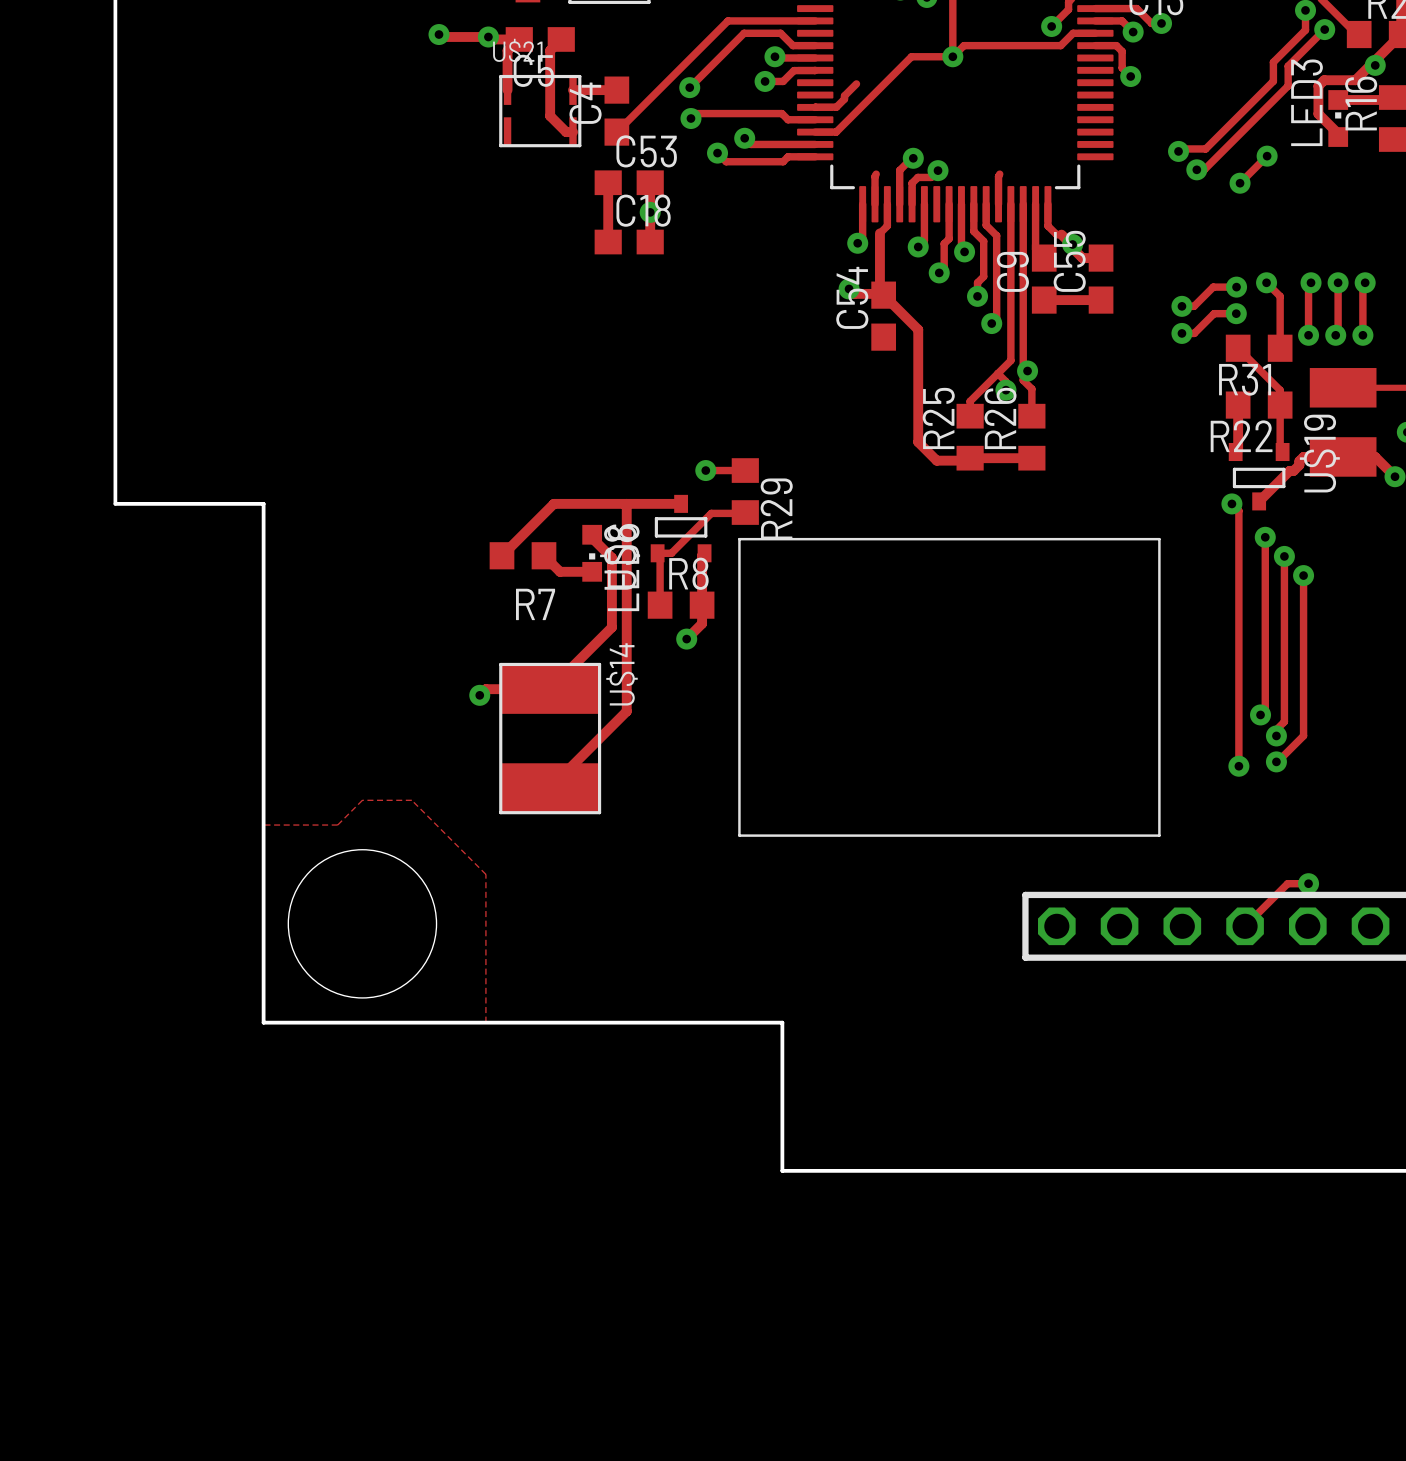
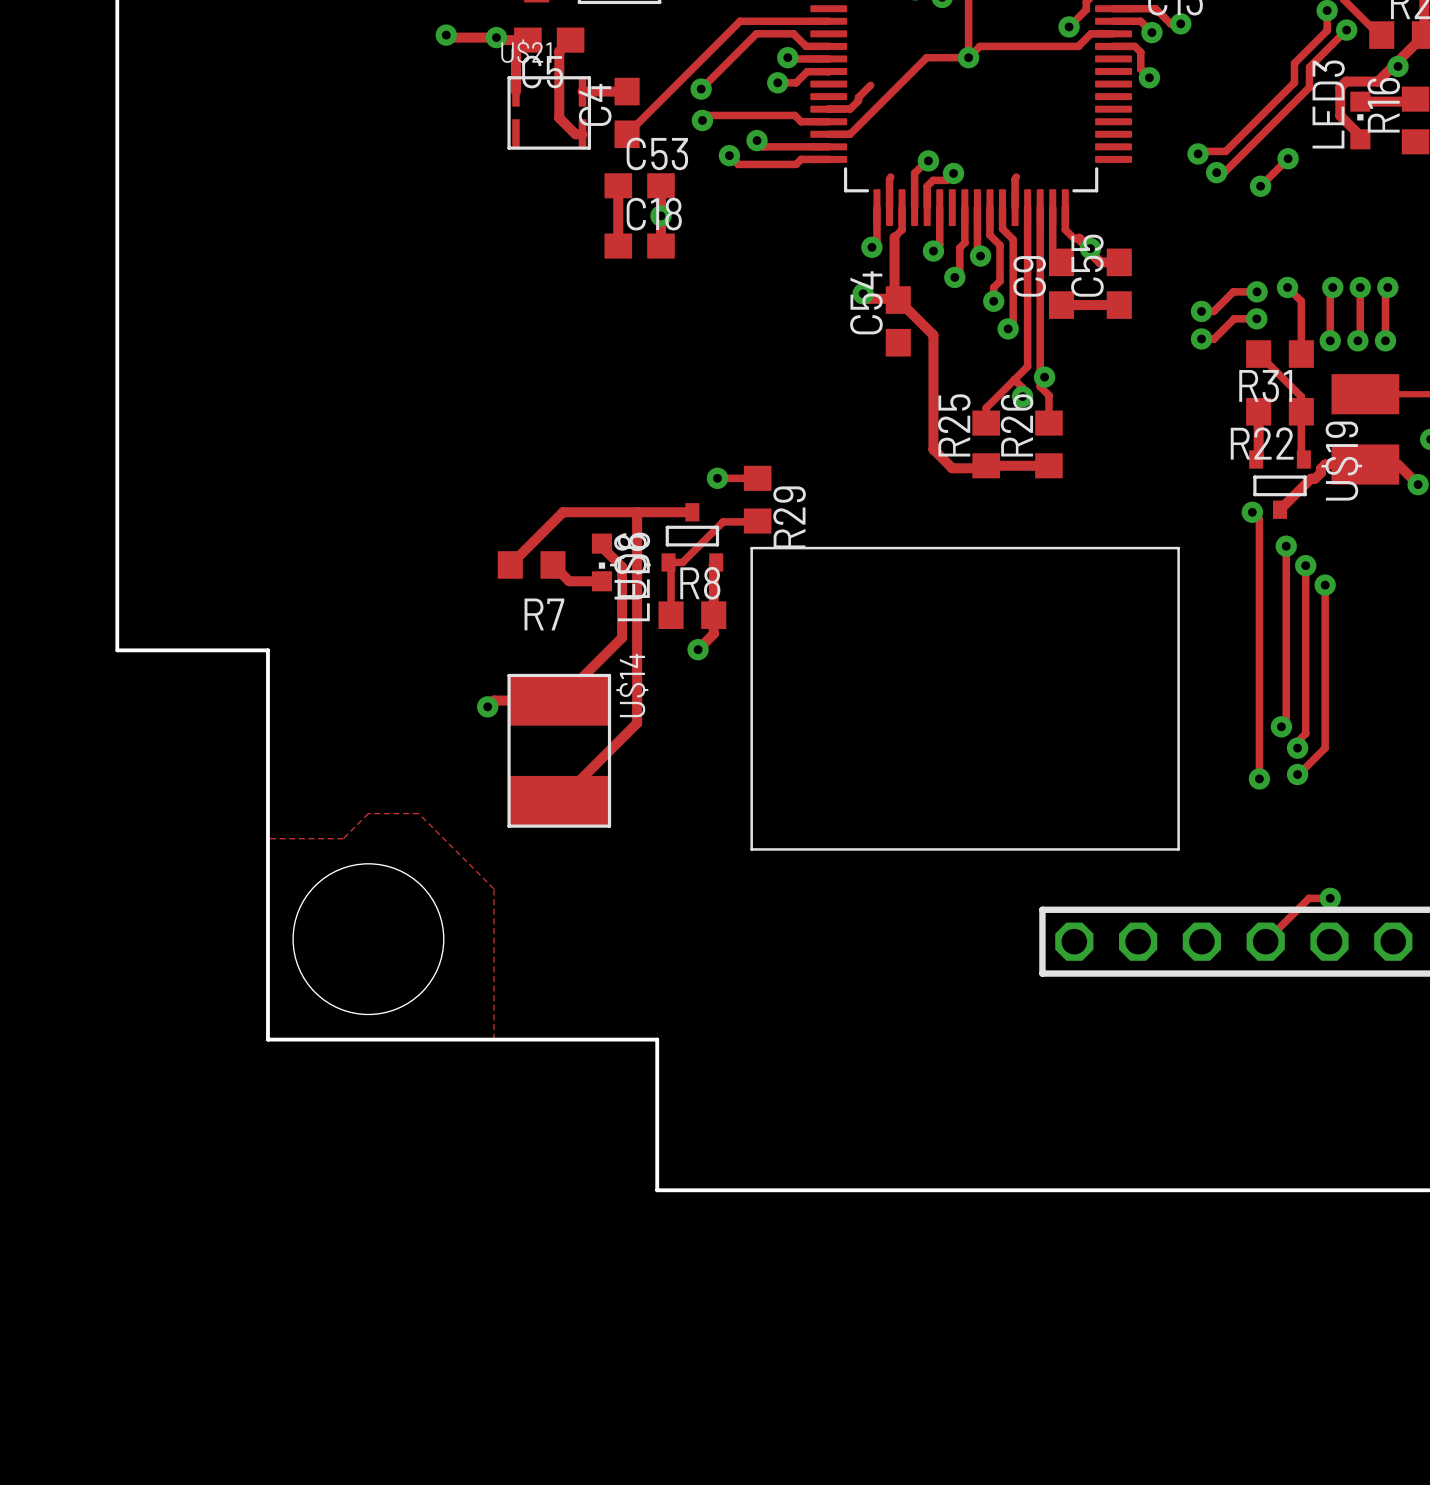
board edge: (115, 503) (263, 503) (263, 639) -> (117, 512) (117, 650) (267, 650)
board edge: (646, 1022) (782, 1022) (782, 1170) -> (657, 1039) (657, 1190) (795, 1190)

